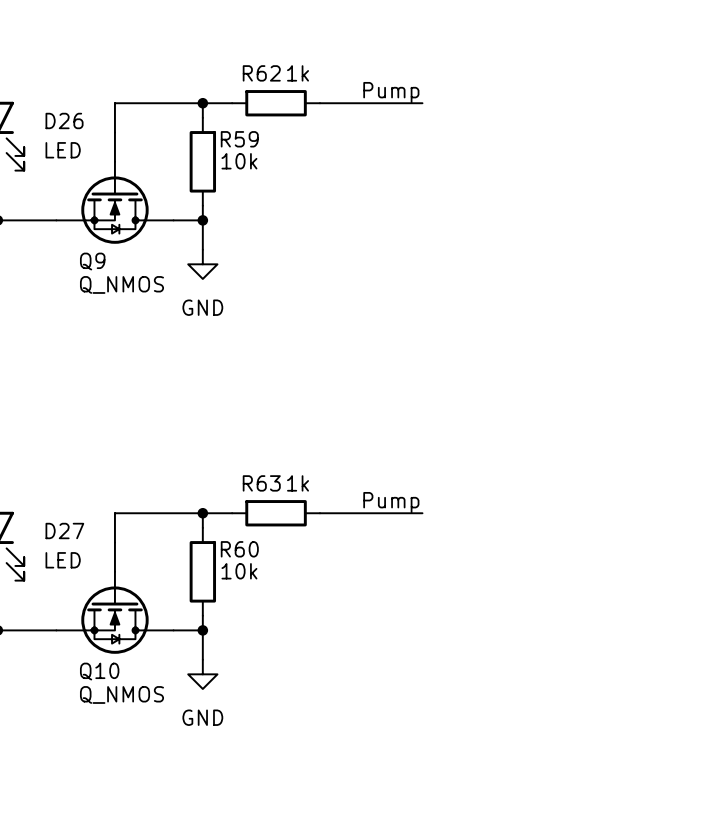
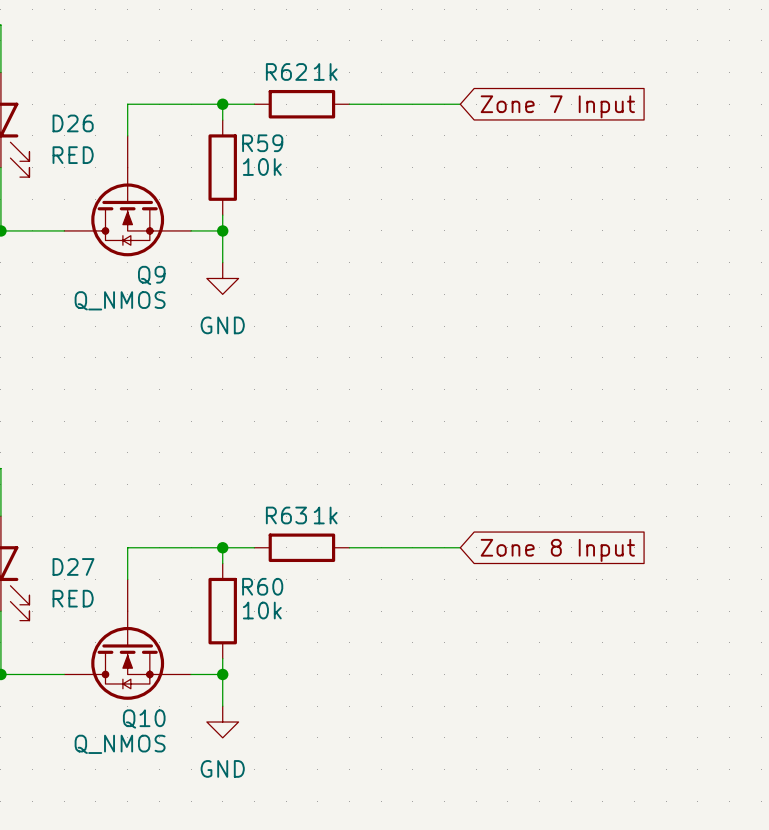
label: Pump (391, 92) -> none
global label: none -> Zone 7 Input (557, 106)
D26 value: LED (63, 150) -> RED (73, 155)
Q9 flip: as is (114, 202) -> left-right (127, 211)
label: Pump (391, 502) -> none
global label: none -> Zone 8 Input (557, 550)
D27 value: LED (63, 560) -> RED (73, 598)
Q10 flip: as is (114, 612) -> left-right (127, 655)

